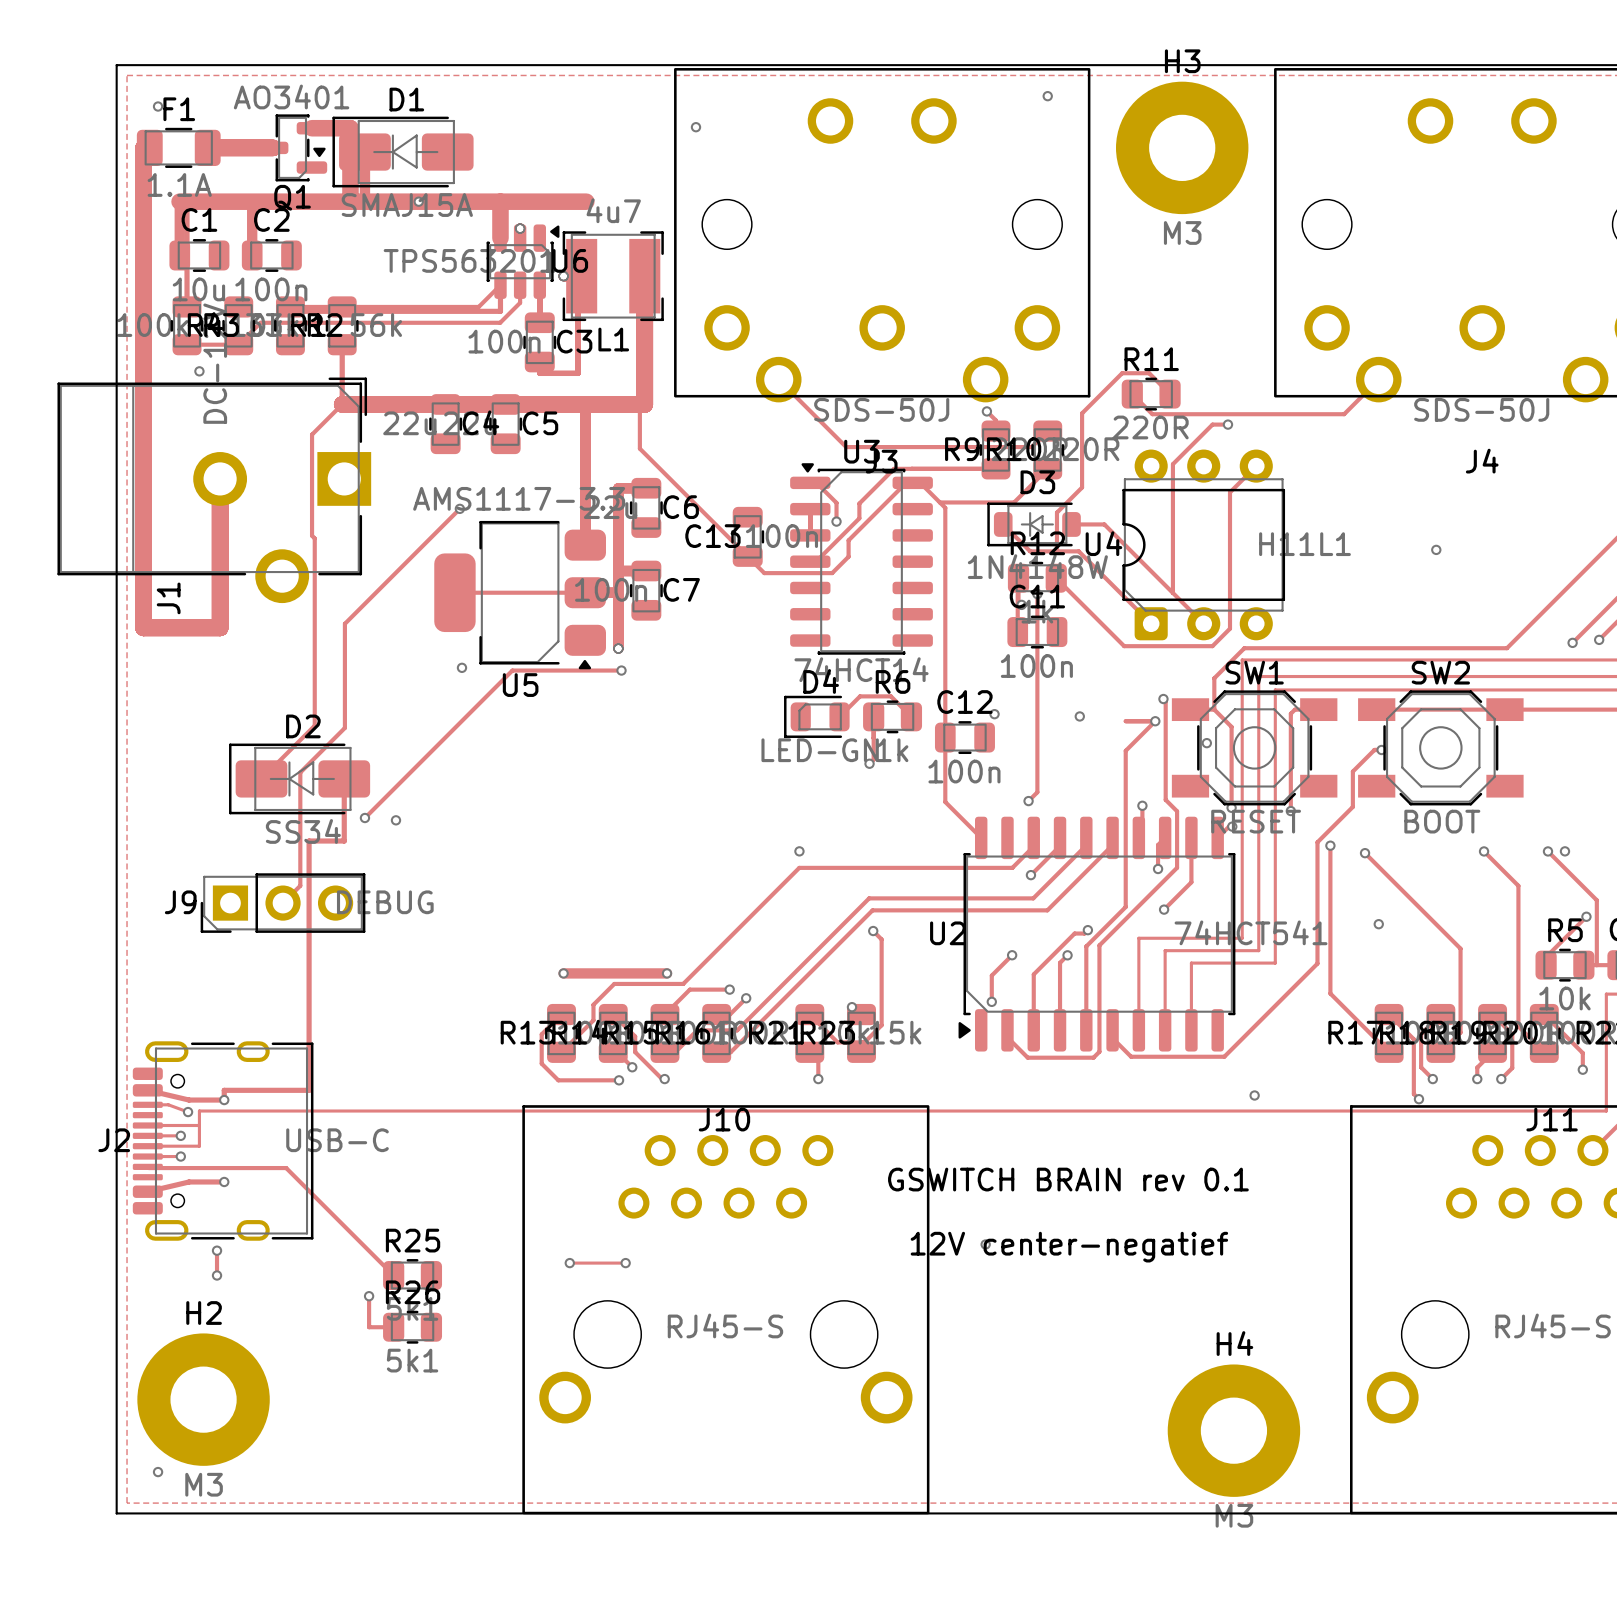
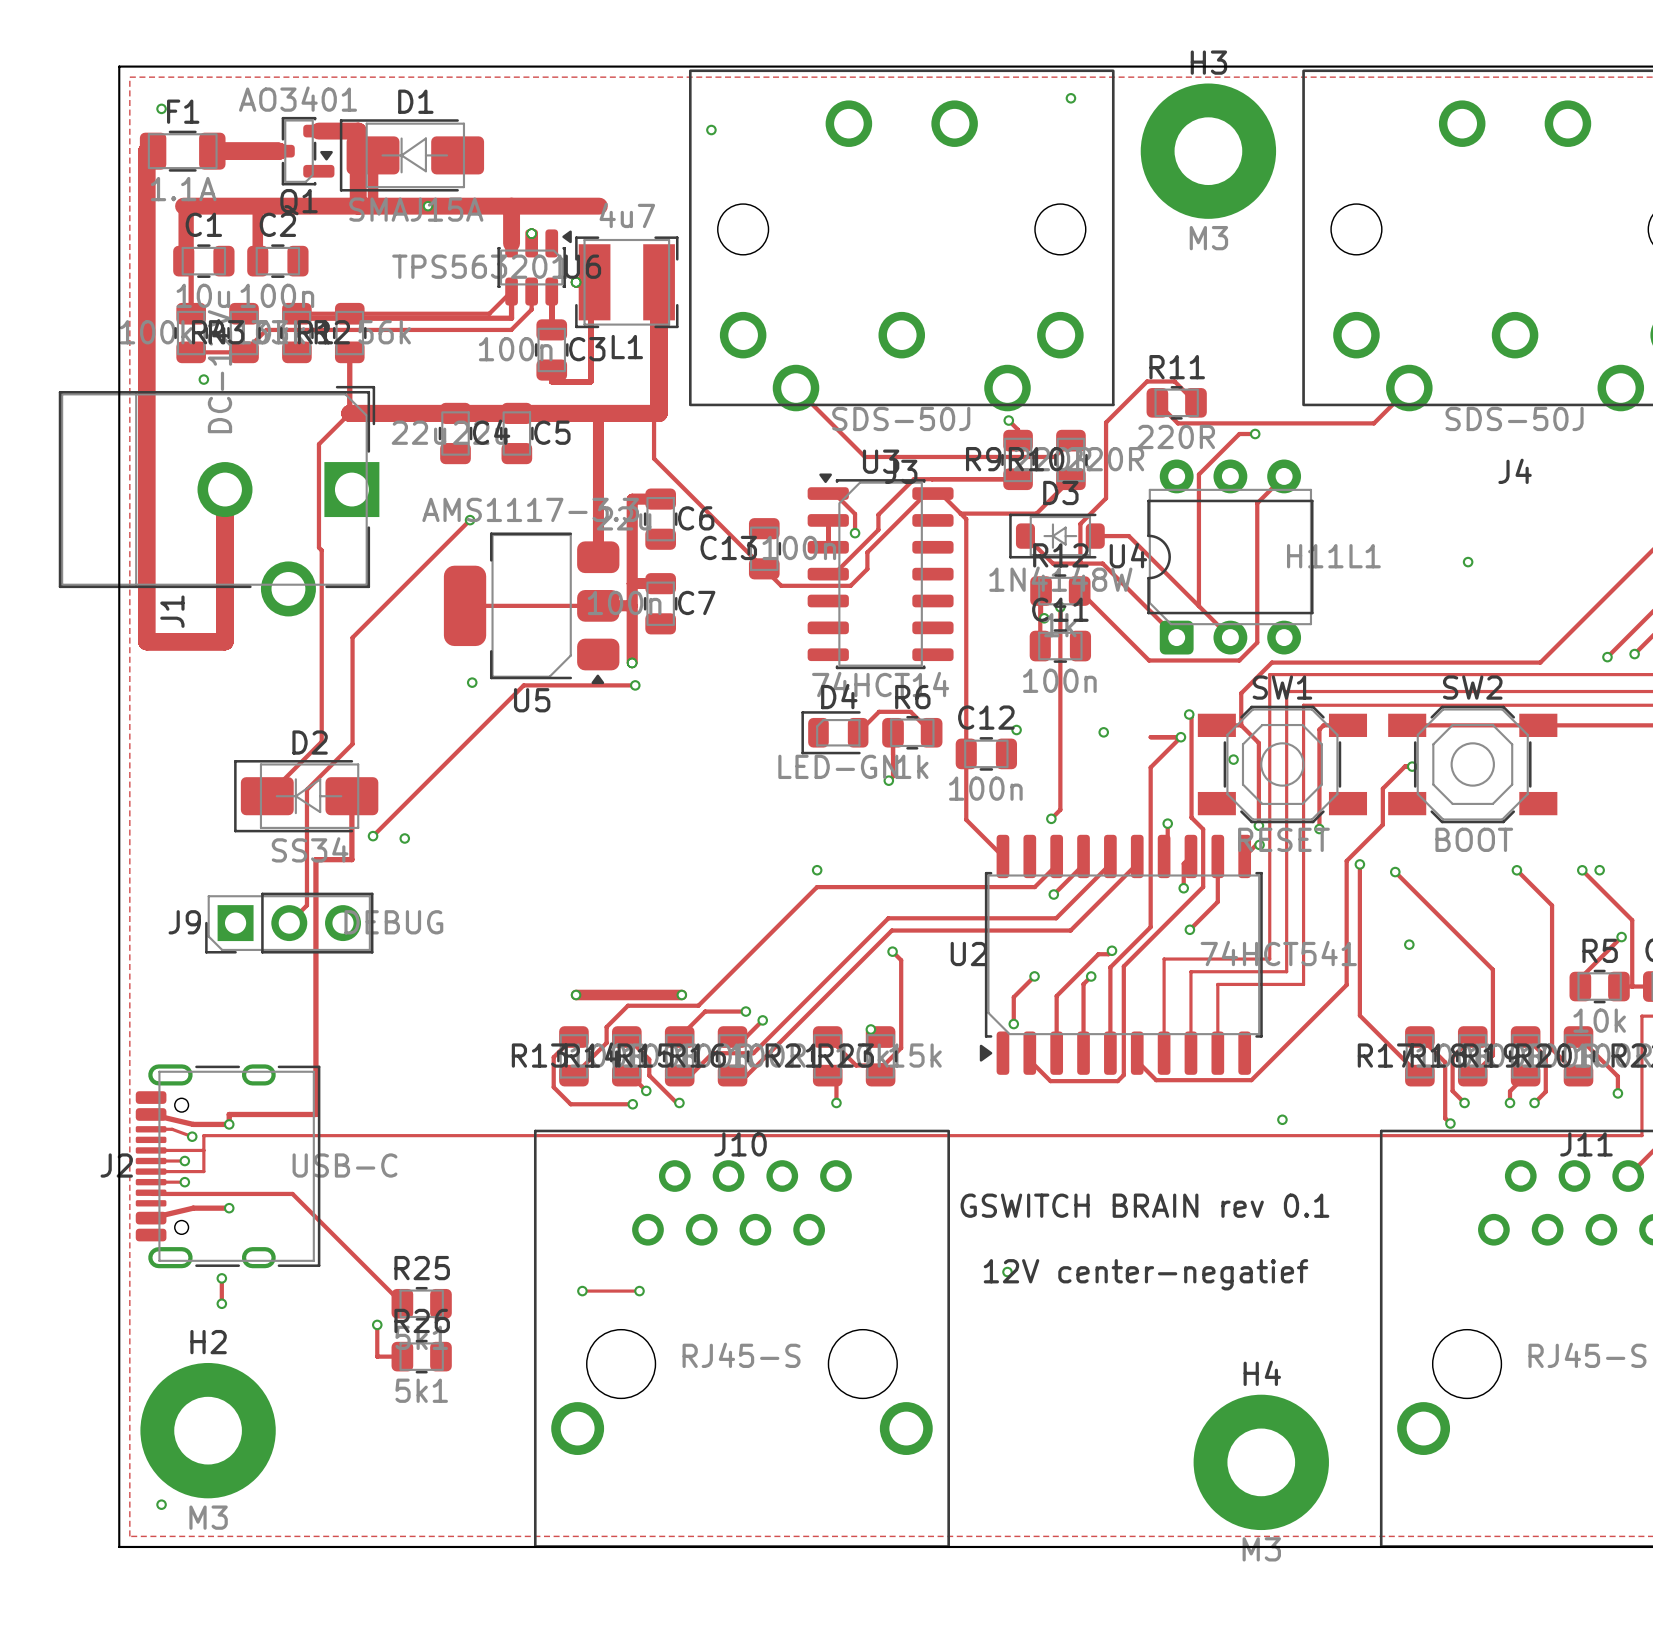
text position: GSWITCH BRAIN rev 0.1 (1068, 1179) -> GSWITCH BRAIN rev 0.1 (1144, 1205)
text position: 12V center-negatief (1069, 1247) -> 12V center-negatief (1145, 1274)

